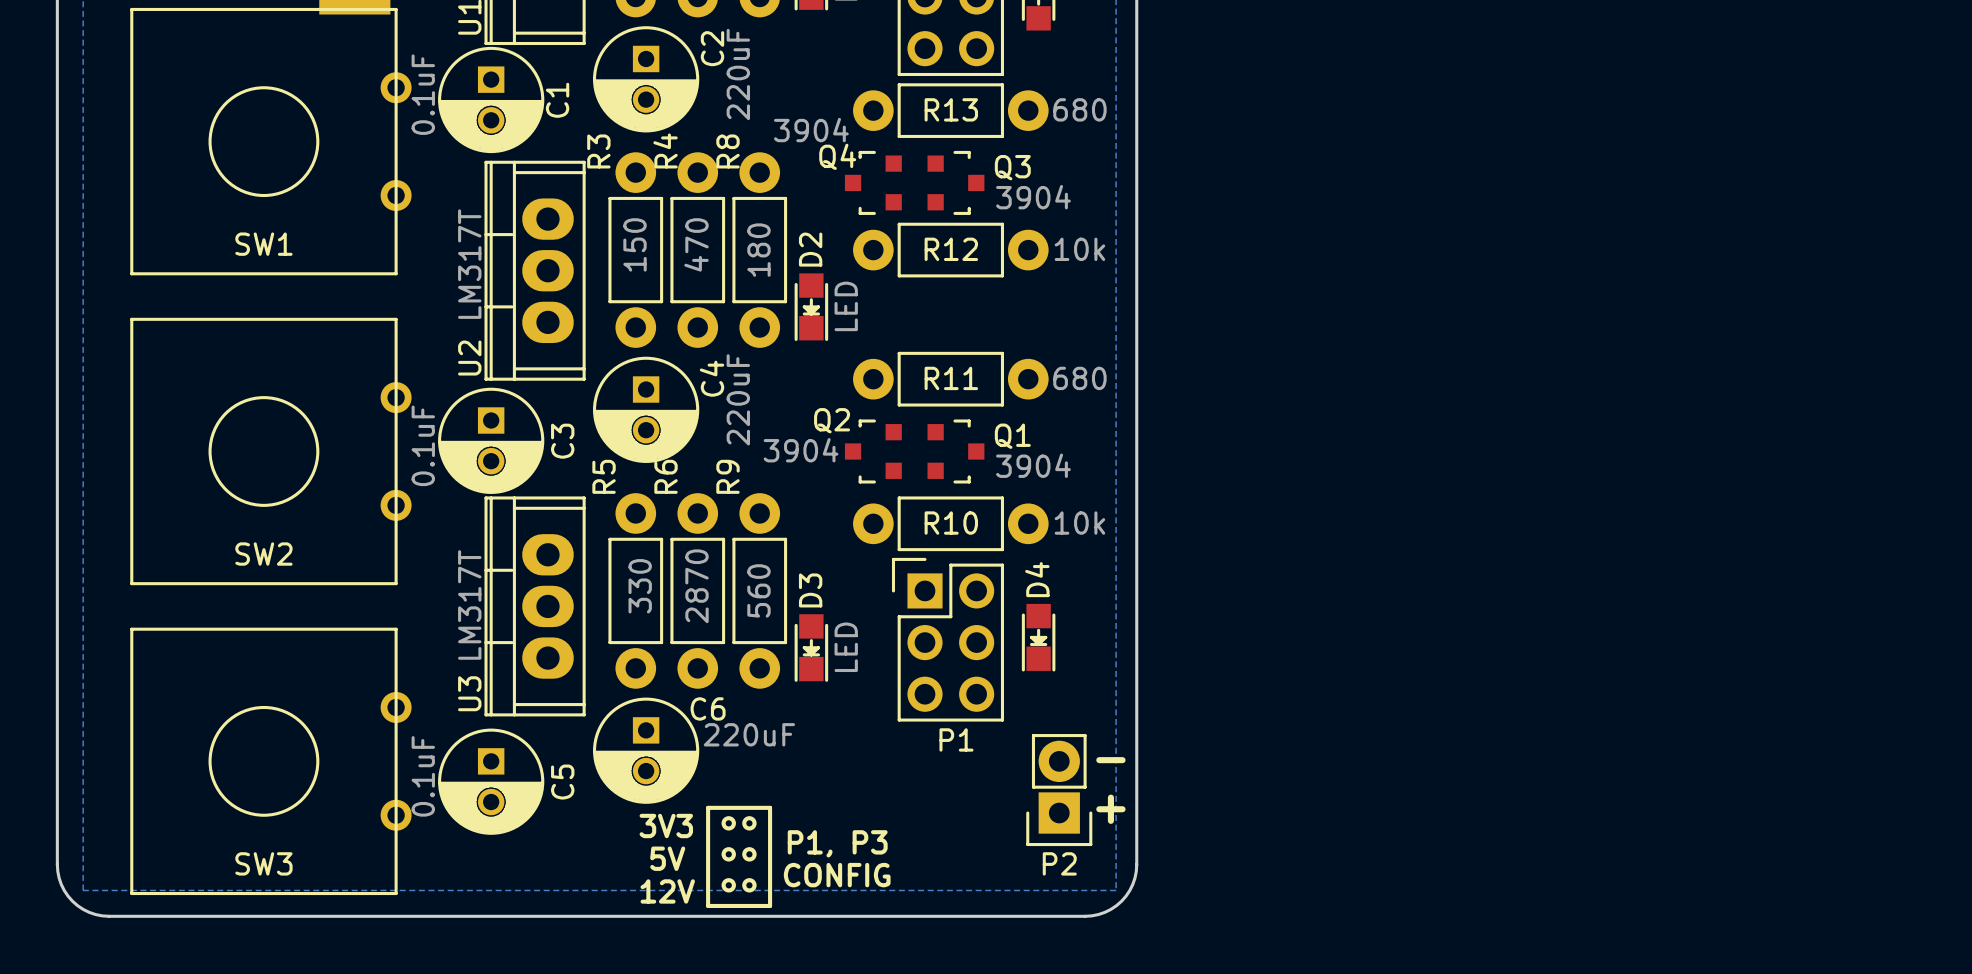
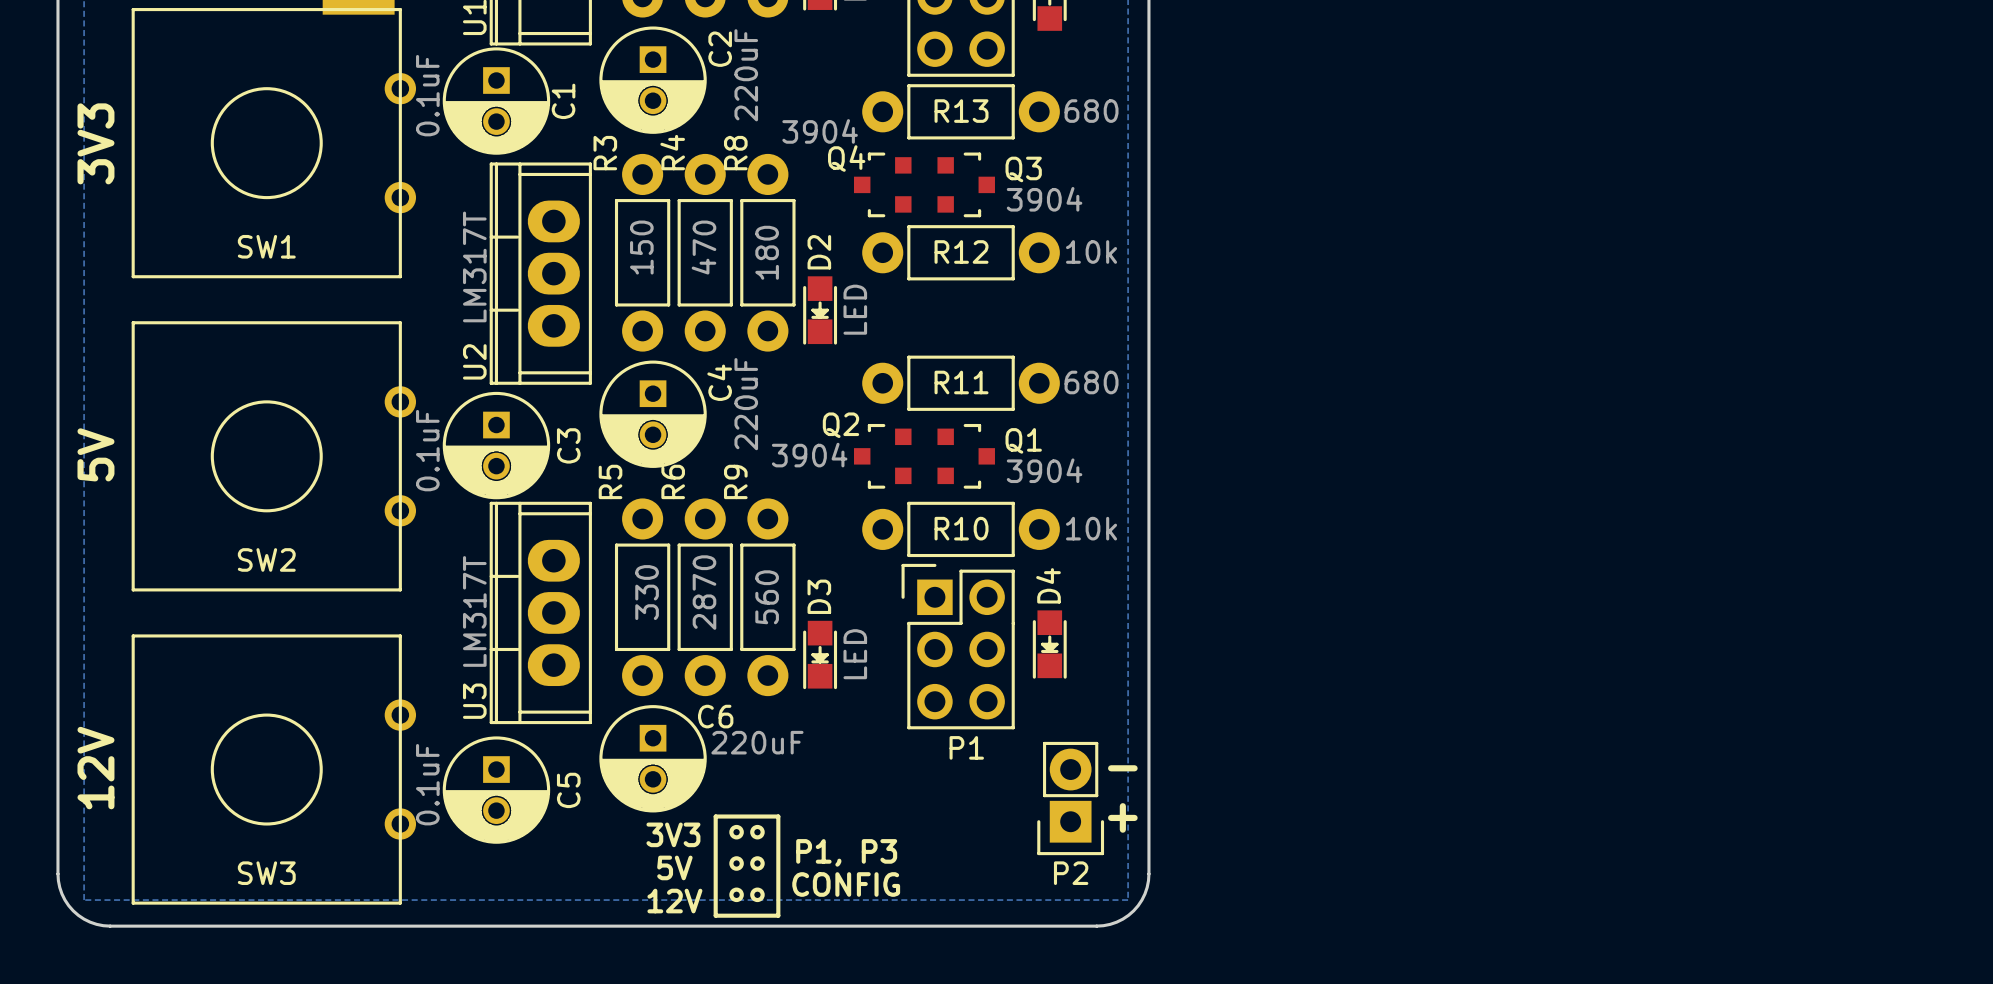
text: none -> 3V3 (95, 143)
text: none -> 5V (95, 454)
text: none -> 12V (95, 768)

